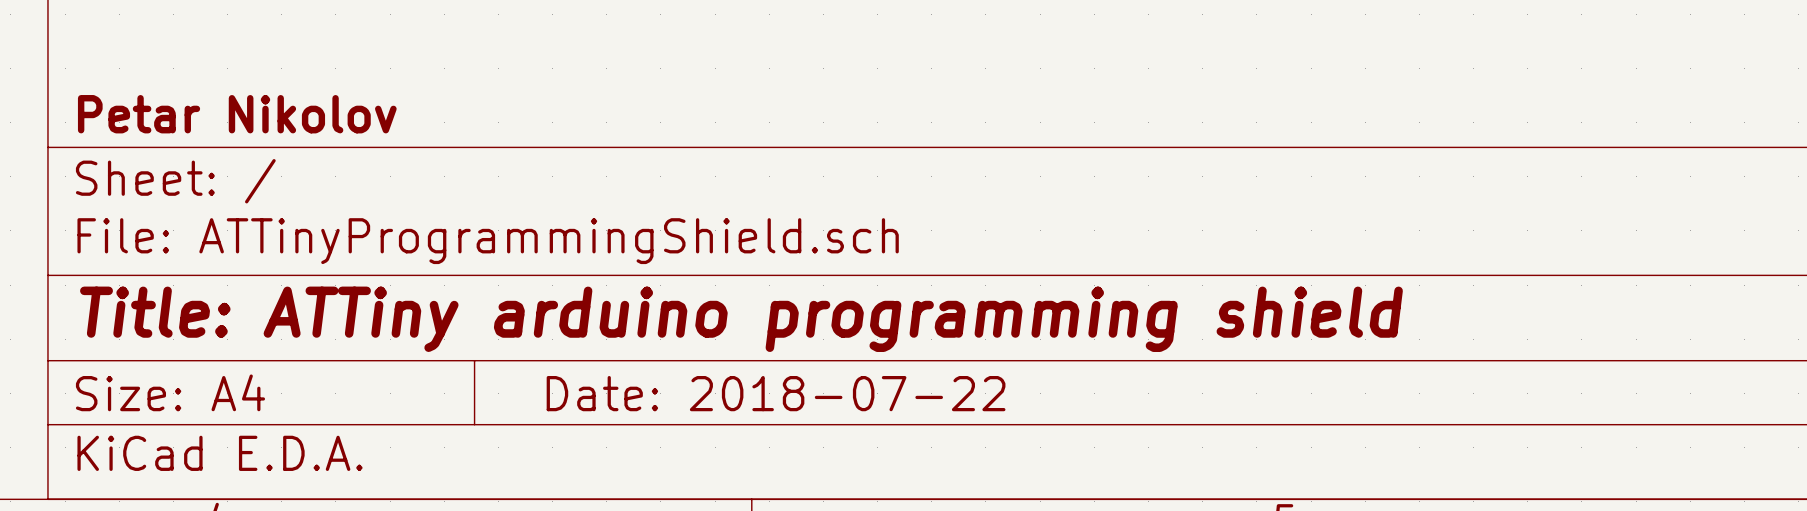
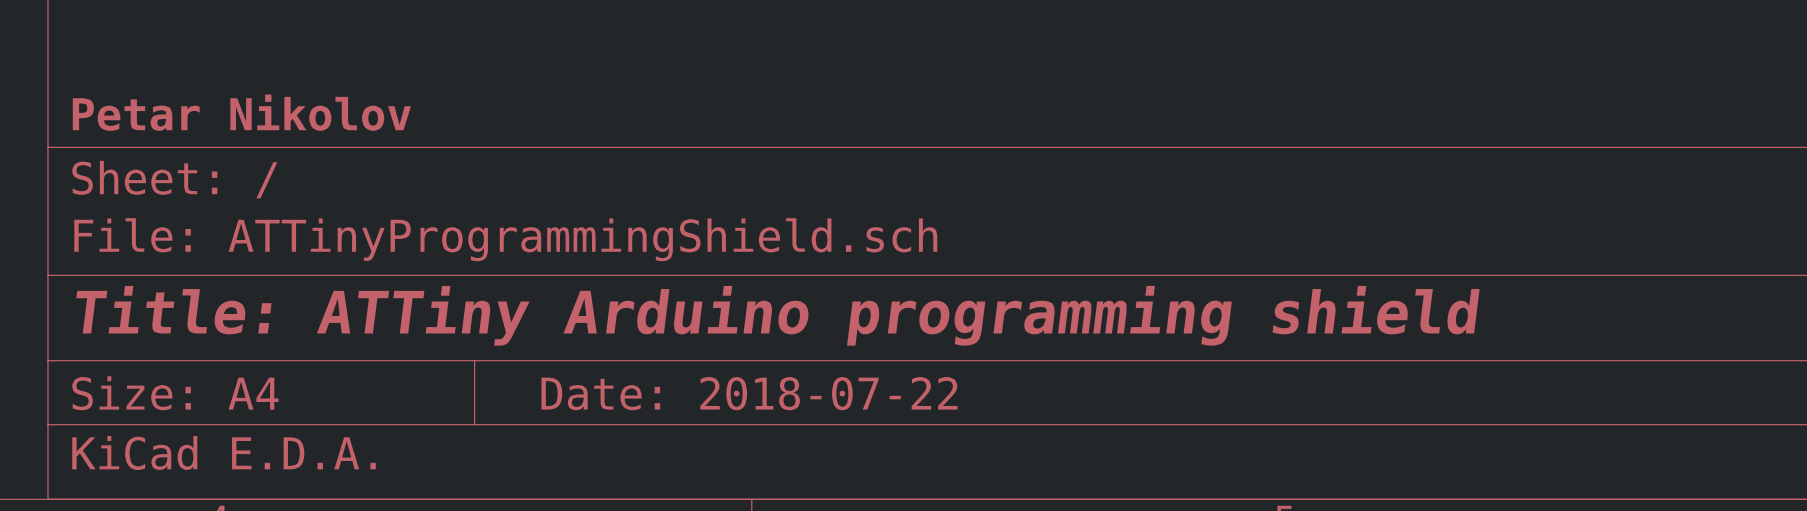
title block: Title: ATTiny arduino programming shield (741, 319) -> Title: ATTiny Arduino programming shield (777, 315)

